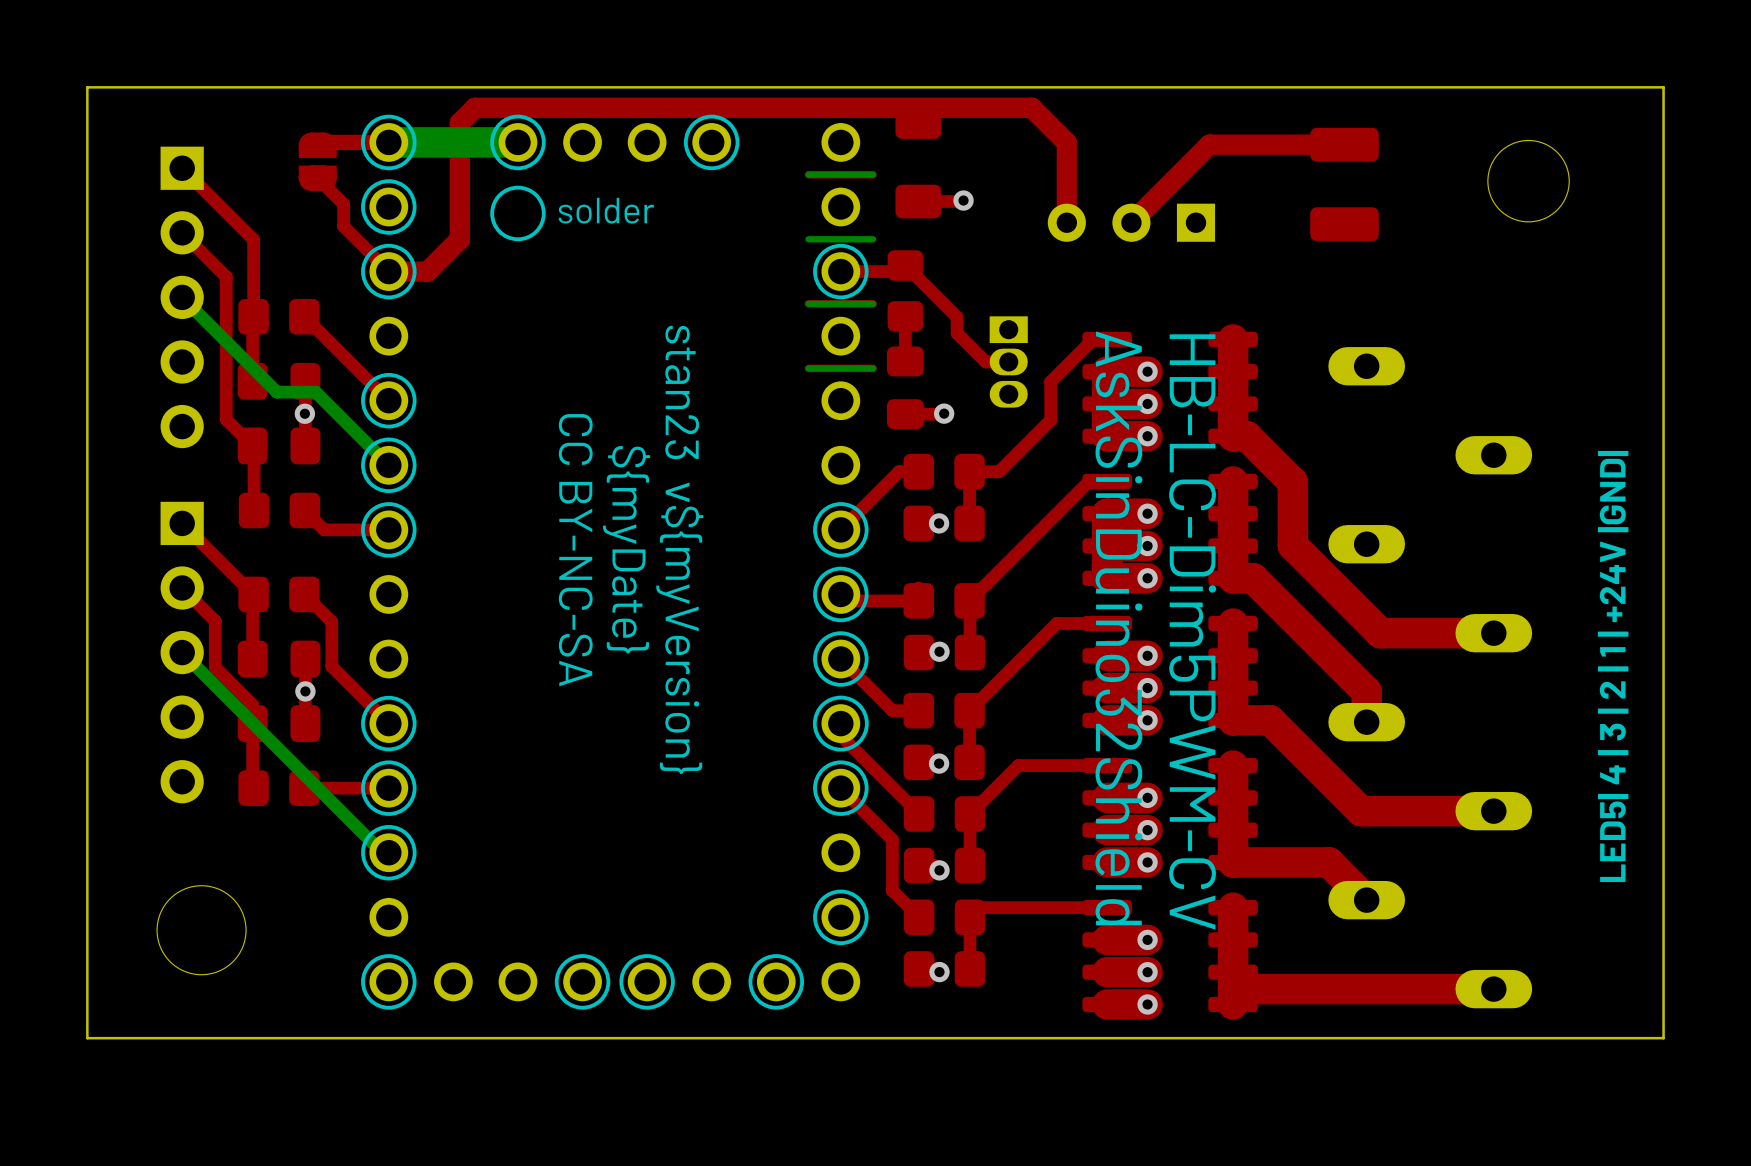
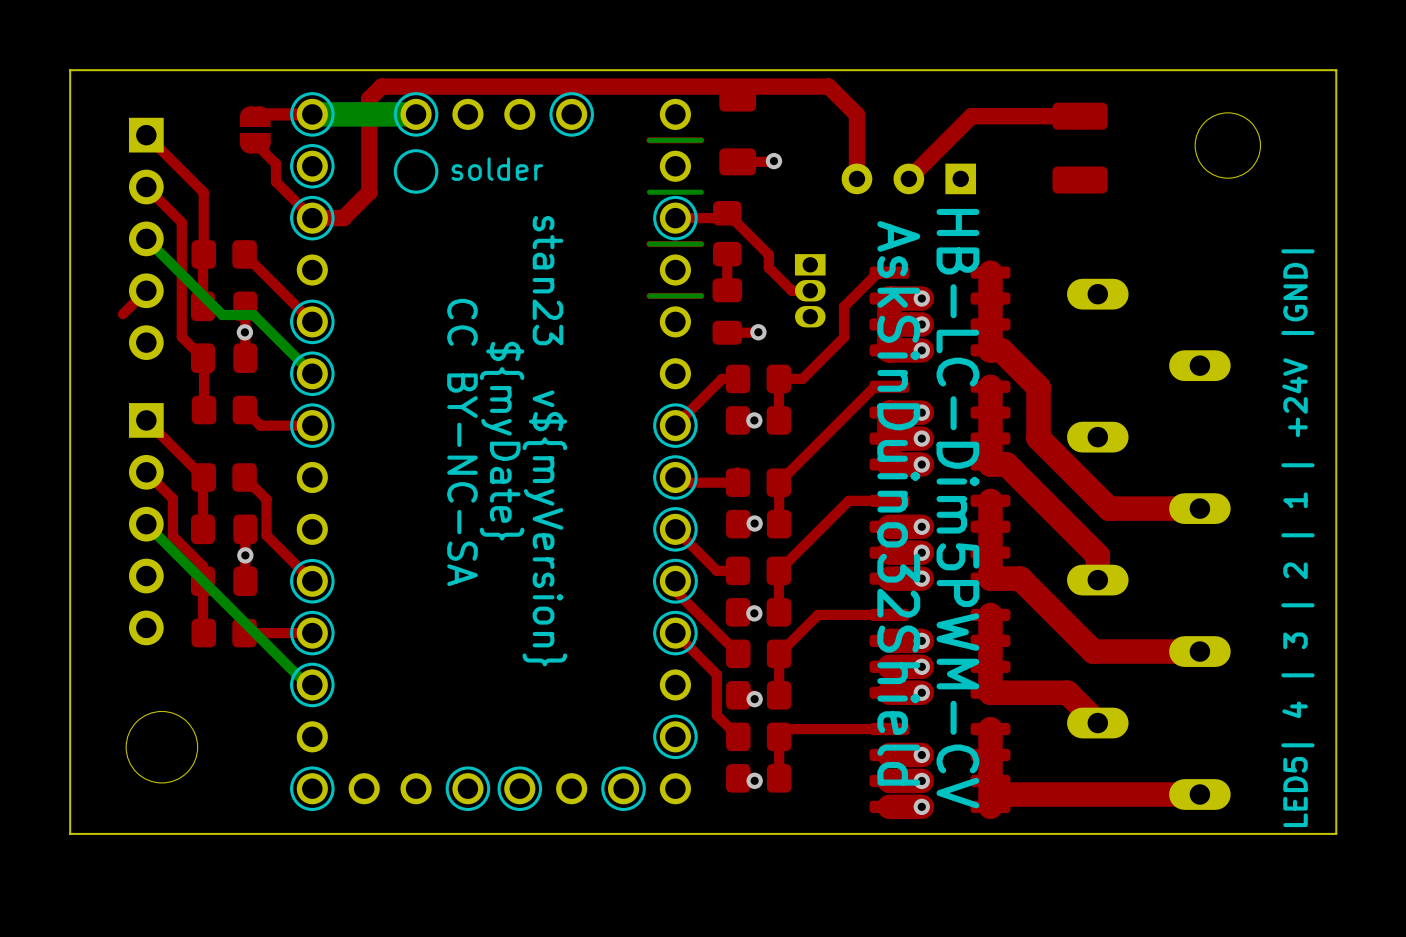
top track: none -> (146, 290) (123, 314)

